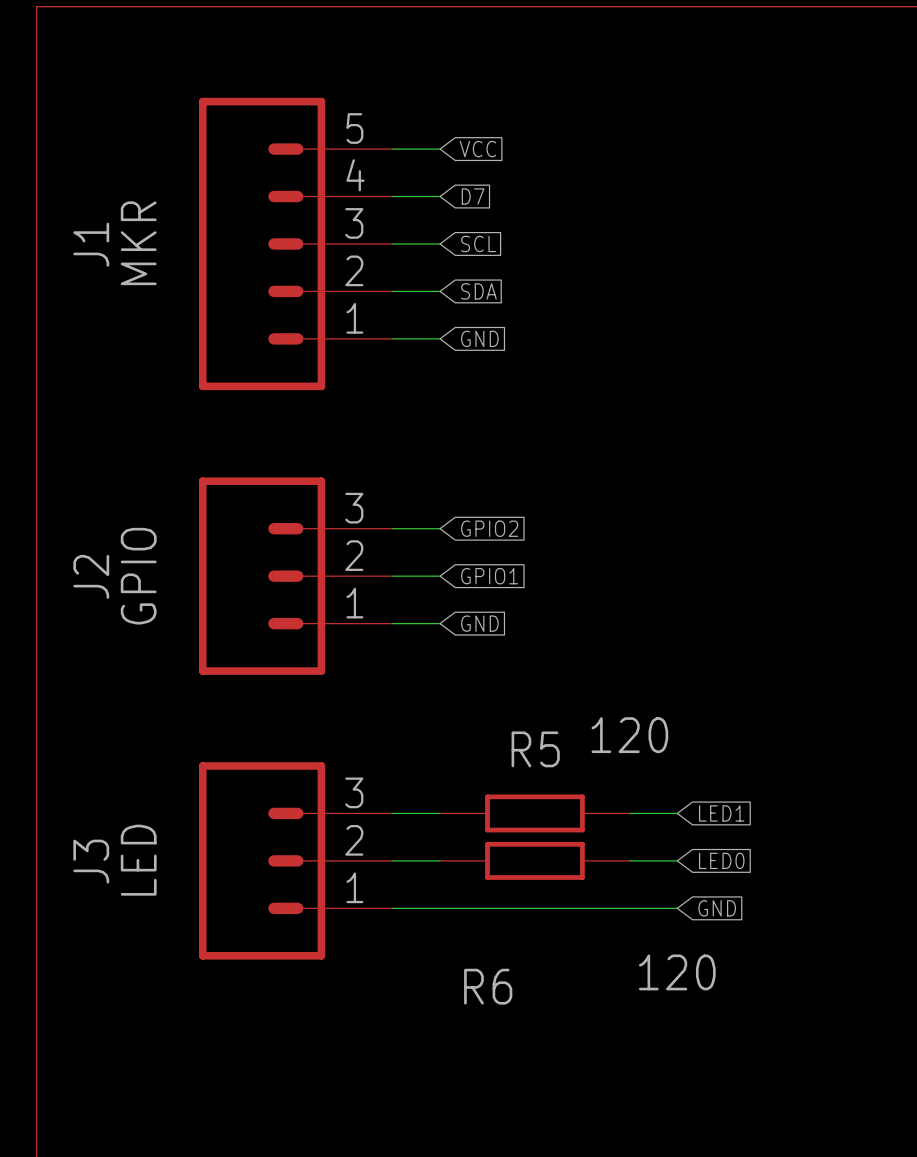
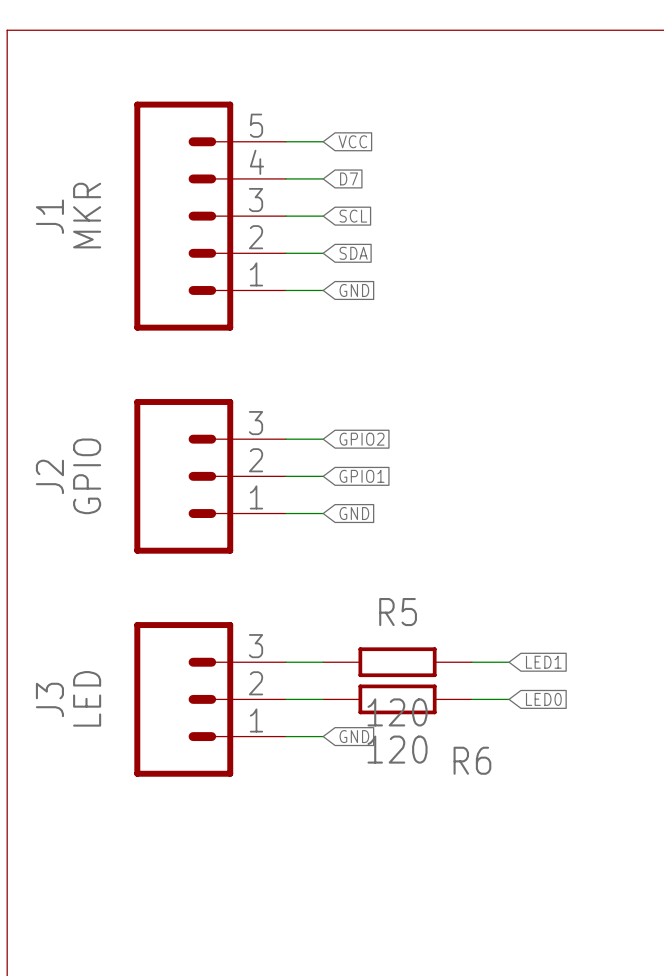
R5 value position: 120 (629, 735) -> 120 (397, 712)
wire: (440, 908) (677, 908) -> none
global label position: GND (717, 908) -> GND (354, 736)
R6 value position: 120 (677, 972) -> 120 (397, 749)
R6 name position: R6 (488, 986) -> R6 (472, 760)

